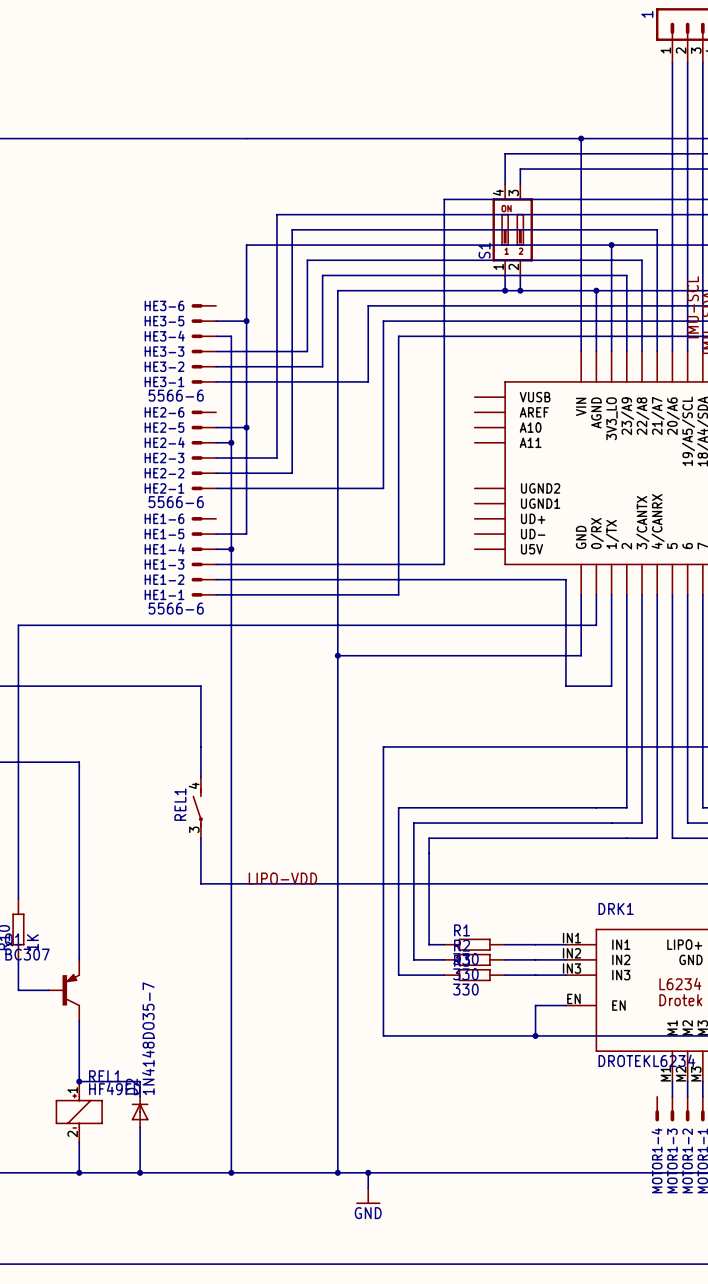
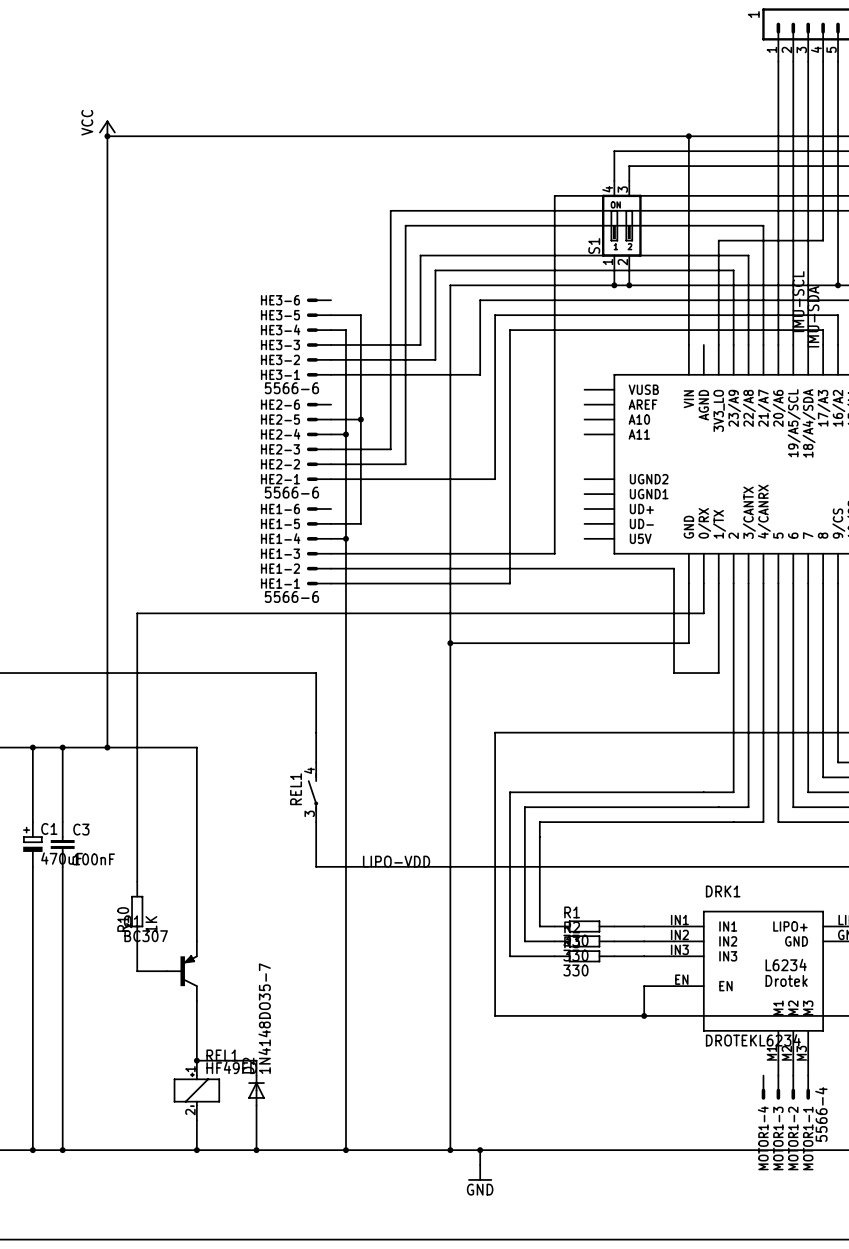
wire: (611, 245) (246, 245) (246, 321) -> none
junction: (611, 245) -> none
wire: (596, 290) (596, 351) -> none
junction: (596, 290) -> none
junction: (246, 321) -> none

